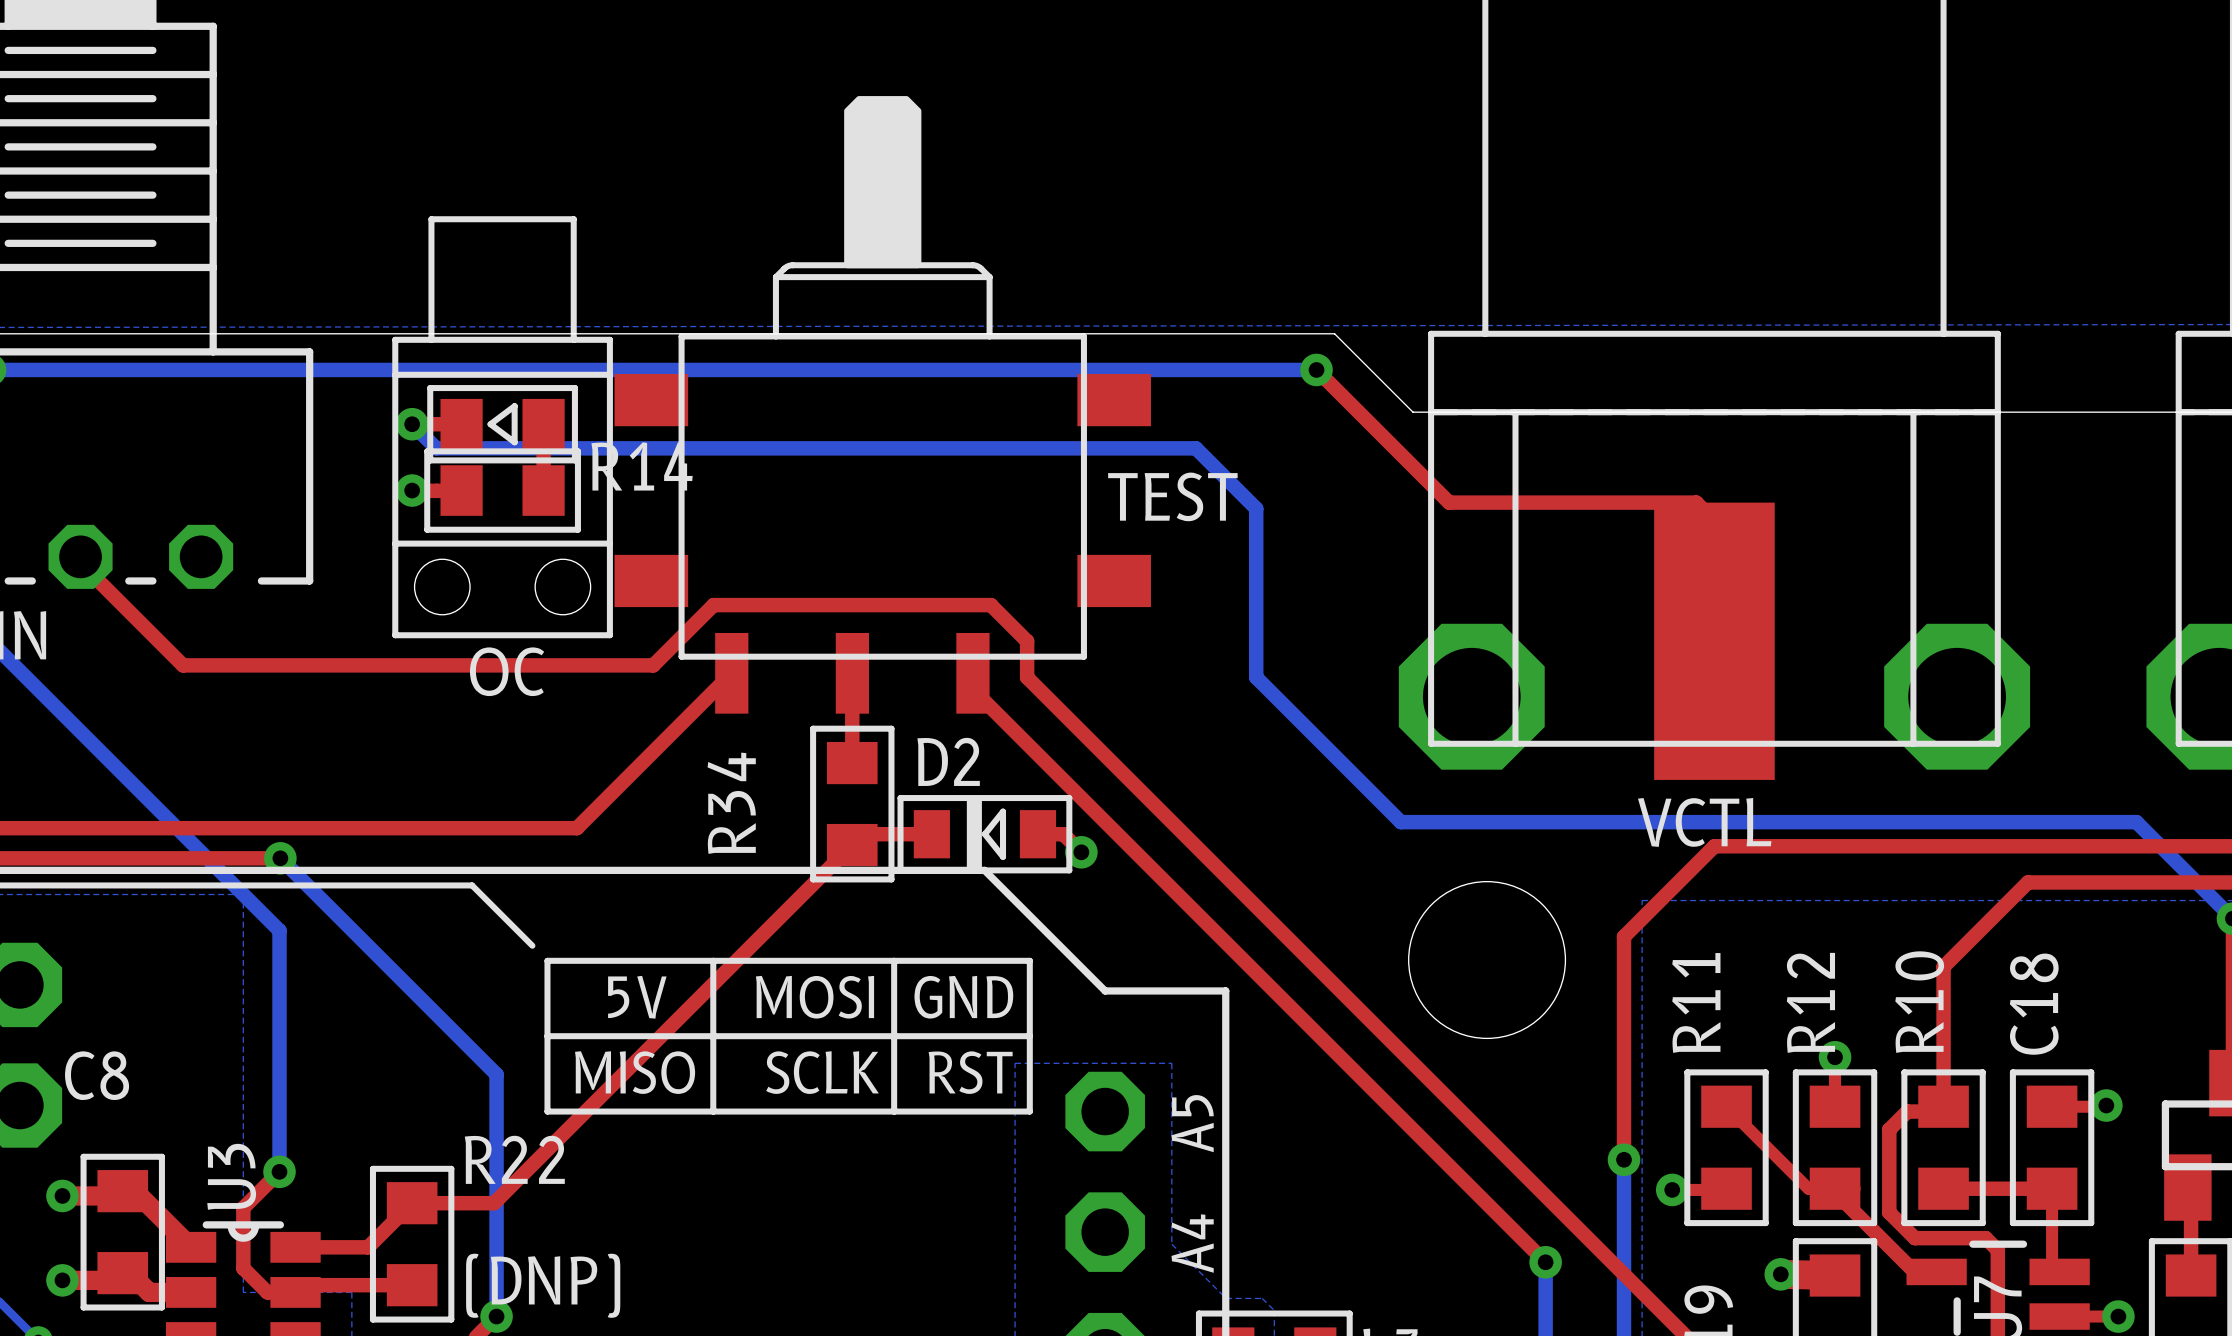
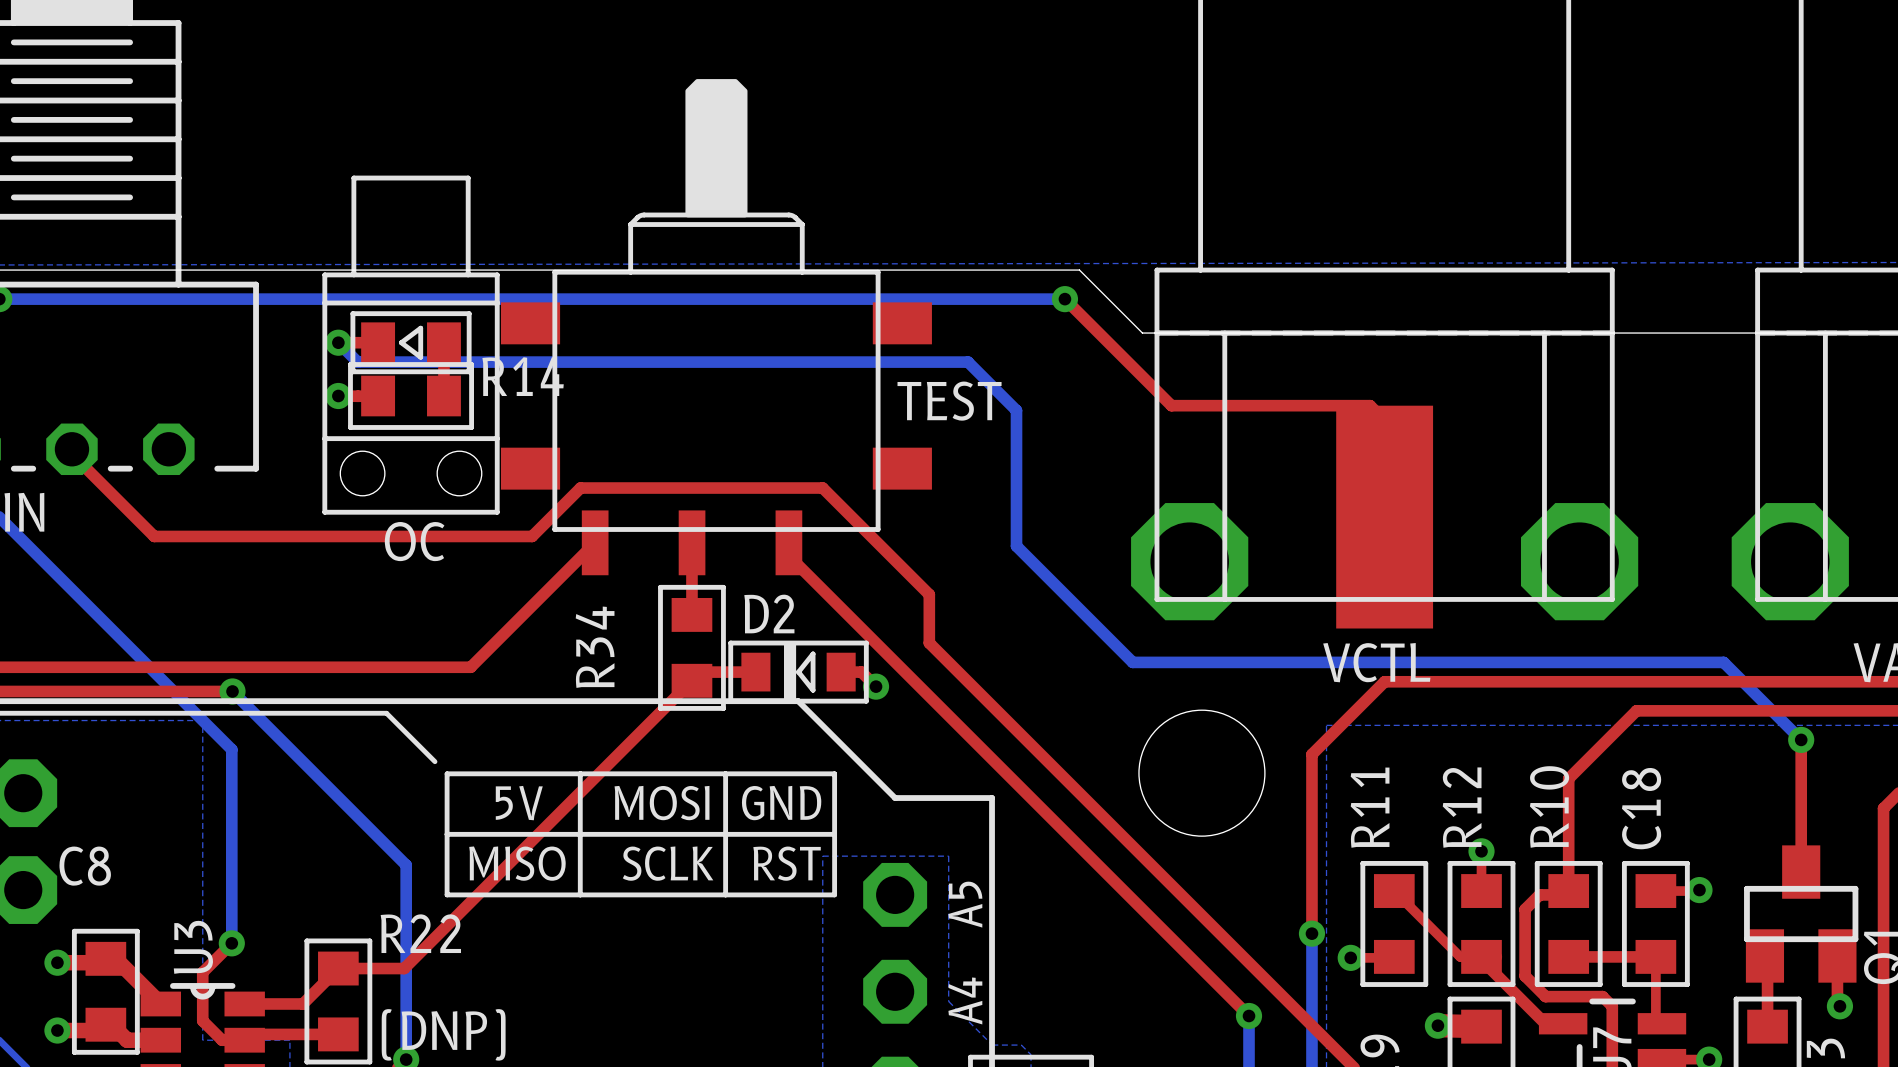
top track: (990, 605) (1027, 641) (1027, 677) (1147, 798) -> (803, 488) (822, 488) (929, 594) (929, 643)

